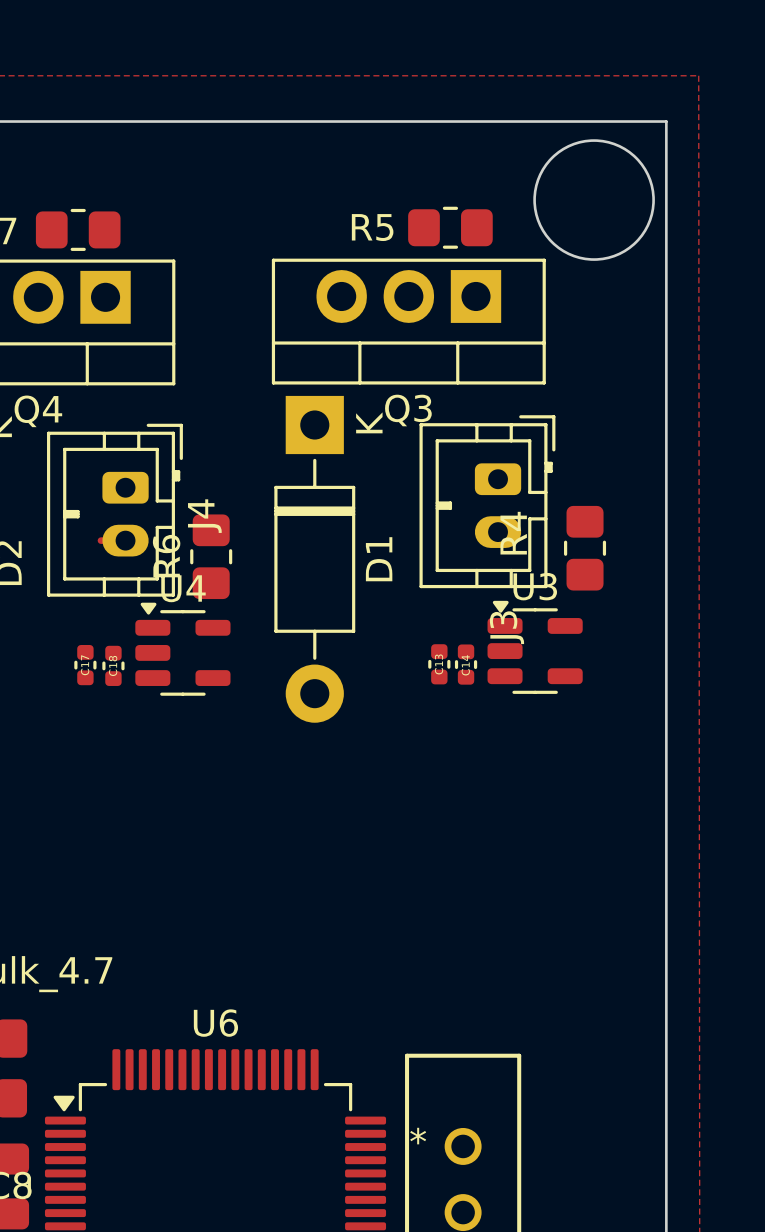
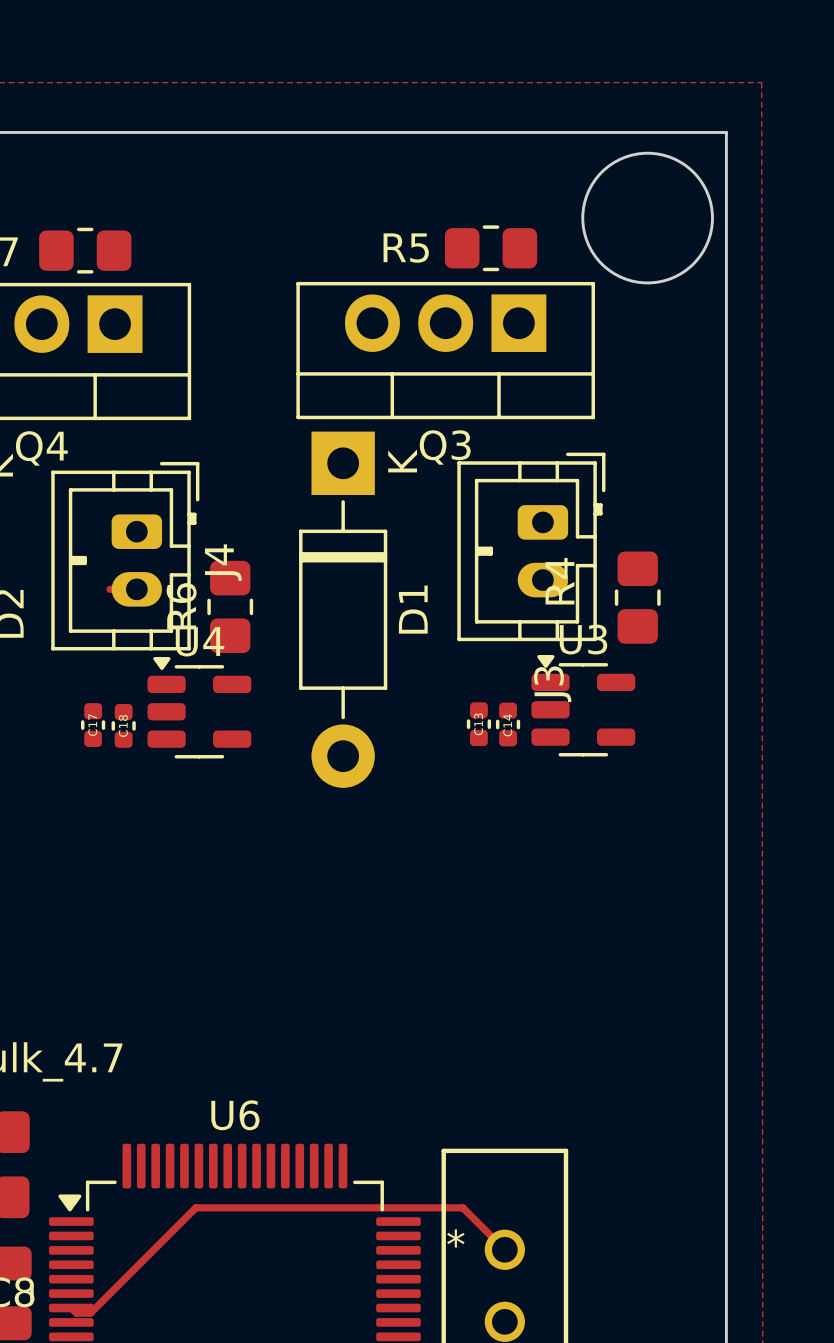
track: none -> (504, 1249) (462, 1207) (195, 1207) (90, 1313) (76, 1313) (71, 1308)

